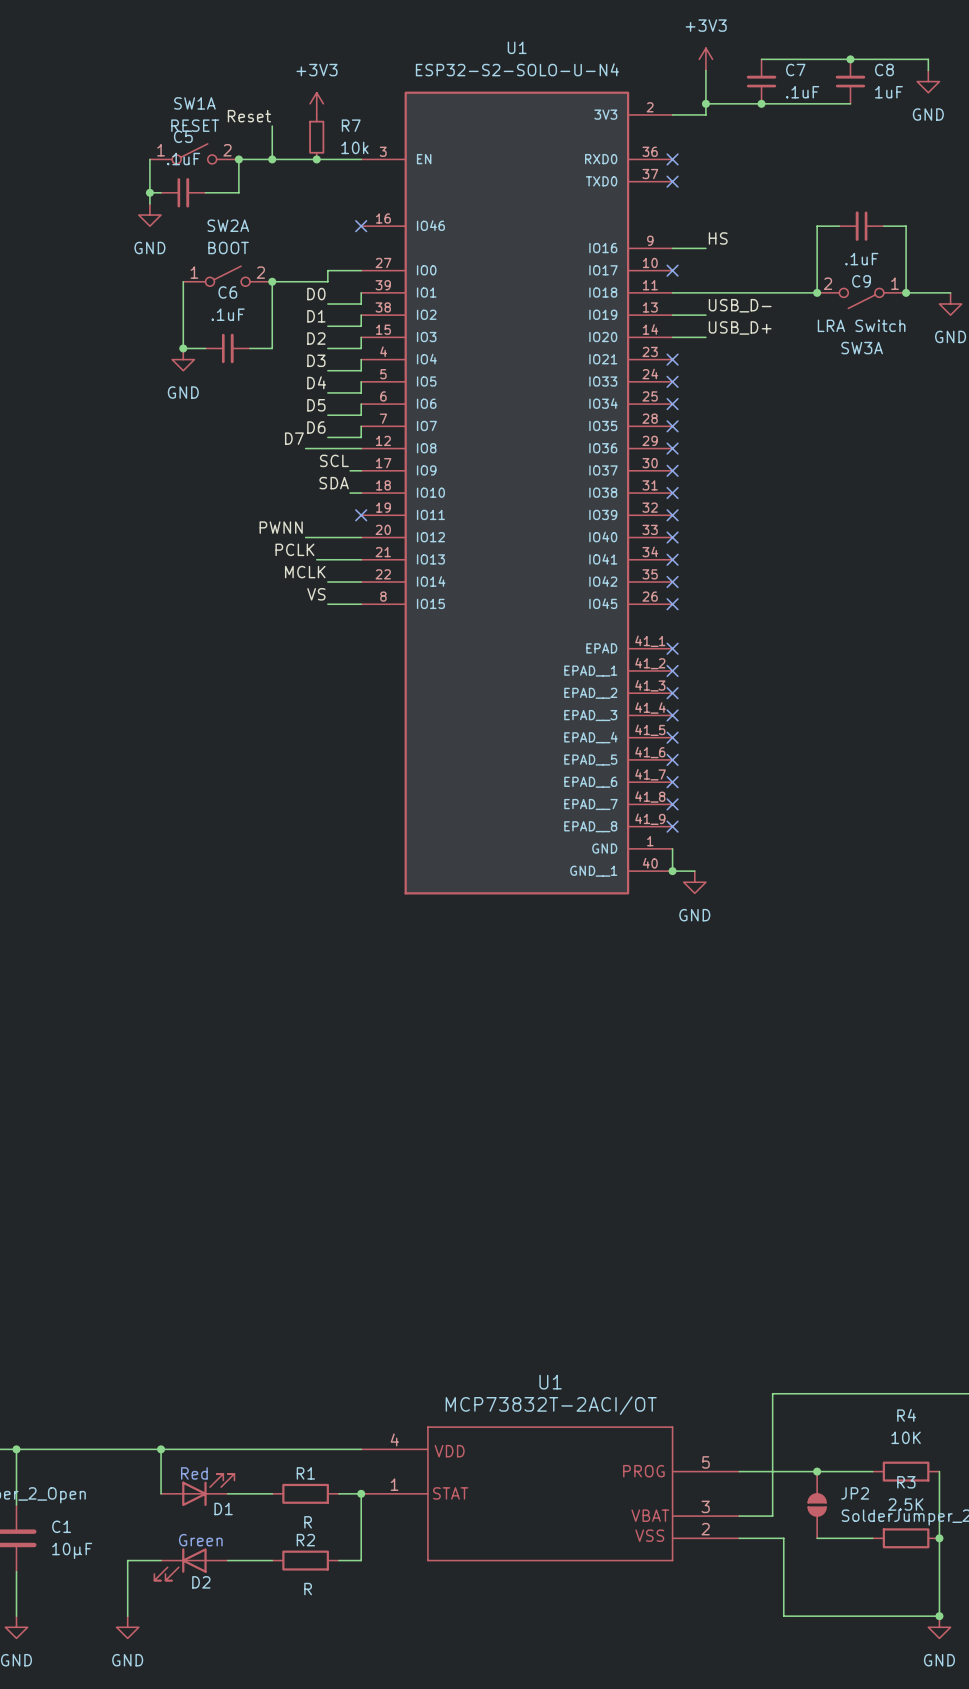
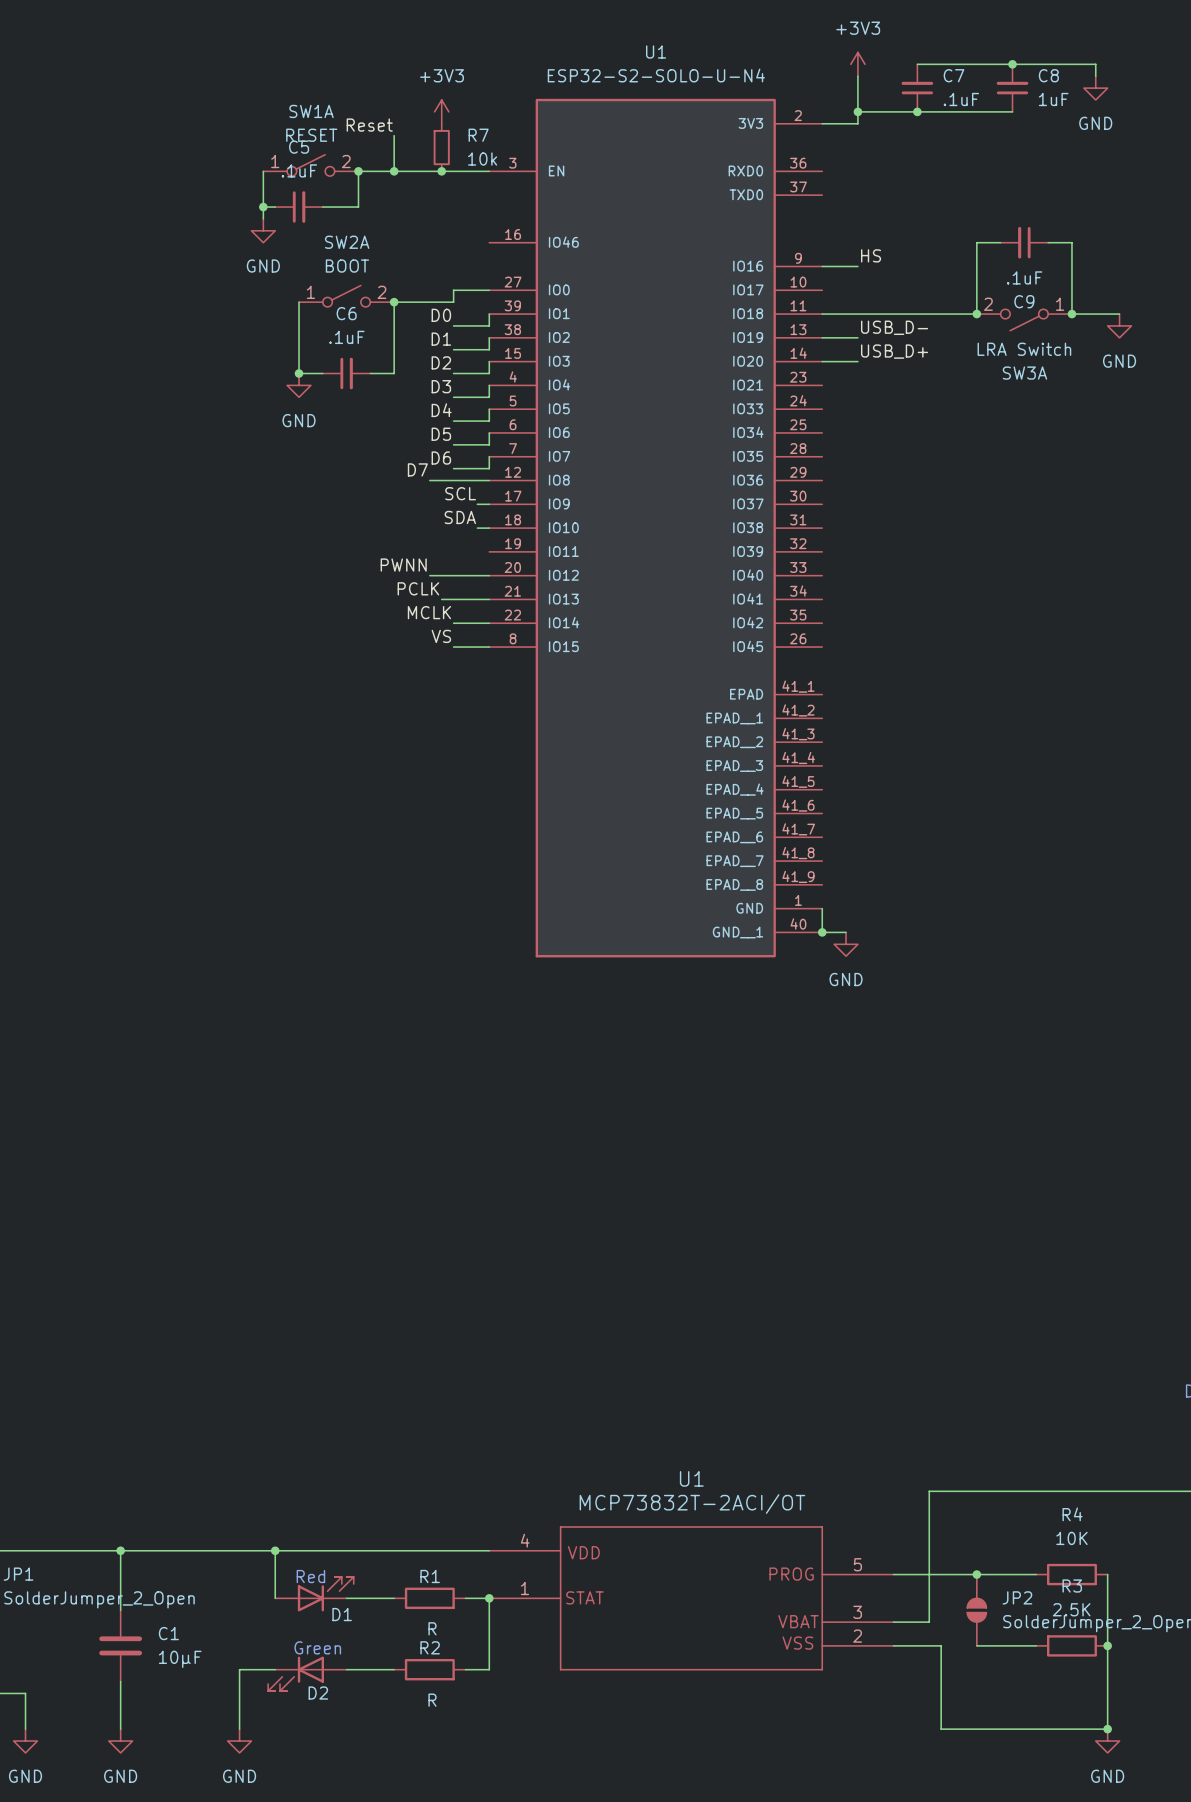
no-connect mark: (672, 159) -> none
no-connect mark: (672, 181) -> none
no-connect mark: (361, 226) -> none
no-connect mark: (672, 270) -> none
no-connect mark: (672, 359) -> none
no-connect mark: (672, 381) -> none
no-connect mark: (672, 404) -> none
no-connect mark: (672, 426) -> none
no-connect mark: (672, 448) -> none
no-connect mark: (672, 470) -> none
no-connect mark: (672, 493) -> none
no-connect mark: (361, 515) -> none
no-connect mark: (672, 515) -> none
no-connect mark: (672, 537) -> none
no-connect mark: (672, 559) -> none
no-connect mark: (672, 582) -> none
no-connect mark: (672, 604) -> none
no-connect mark: (672, 648) -> none
no-connect mark: (672, 670) -> none
no-connect mark: (672, 693) -> none
no-connect mark: (672, 715) -> none
no-connect mark: (672, 737) -> none
no-connect mark: (672, 759) -> none
no-connect mark: (672, 782) -> none
no-connect mark: (672, 804) -> none
no-connect mark: (672, 826) -> none

